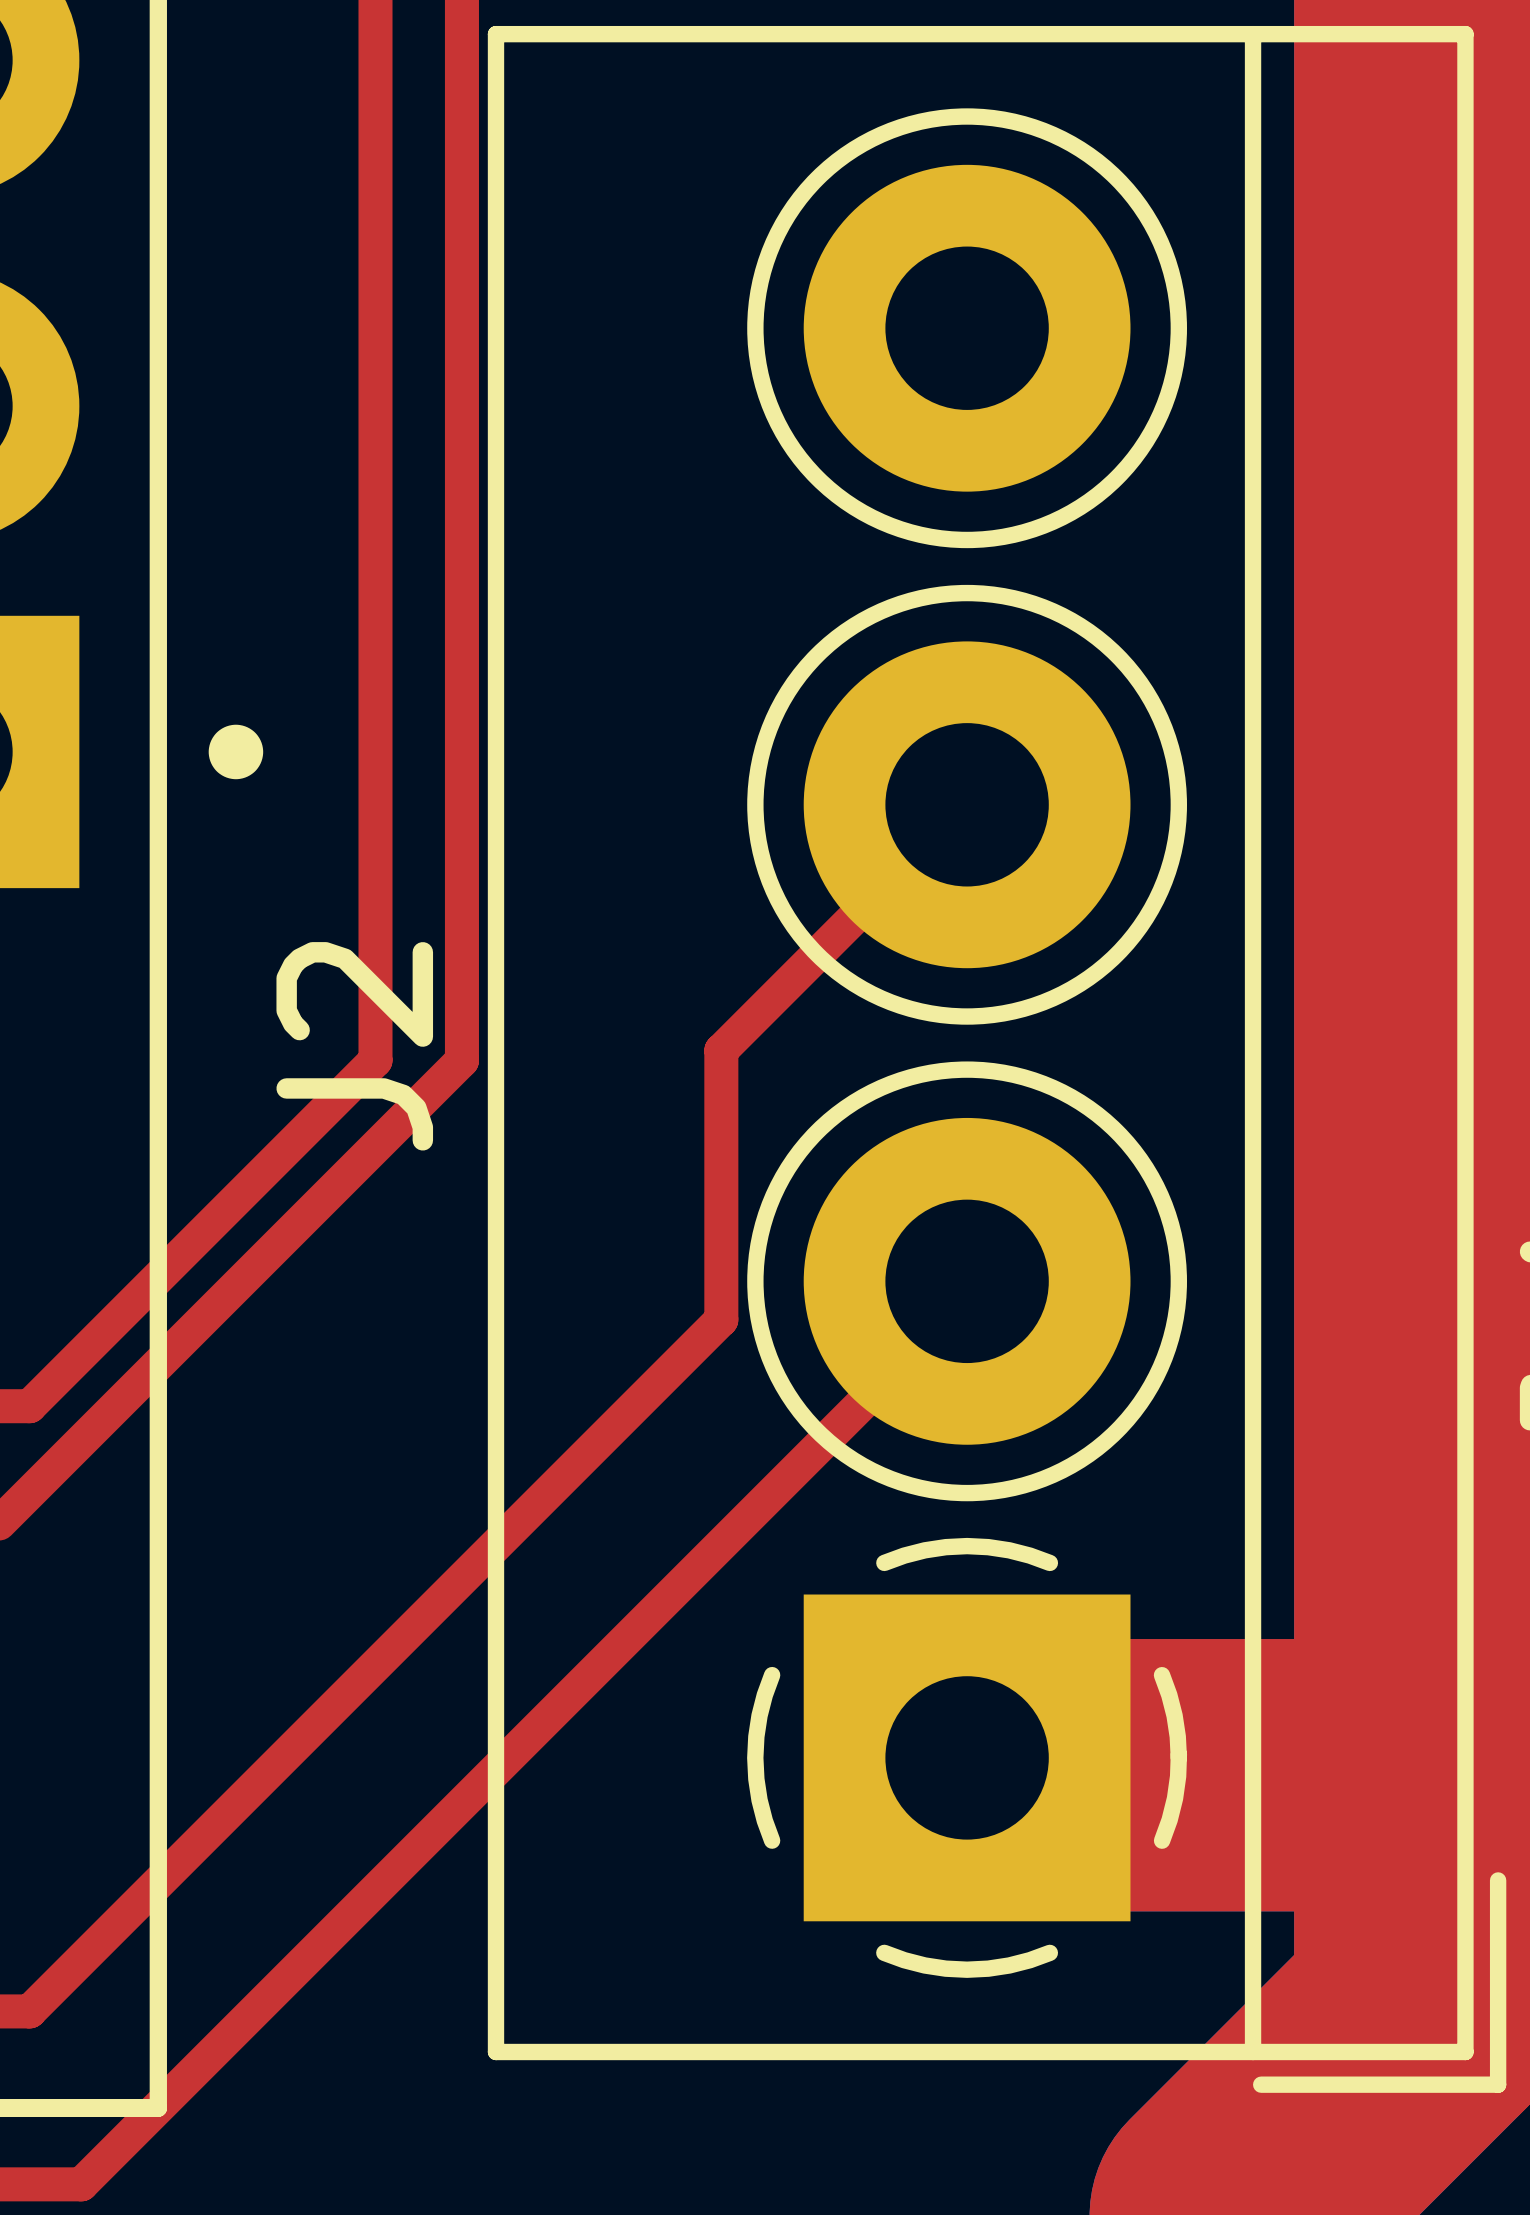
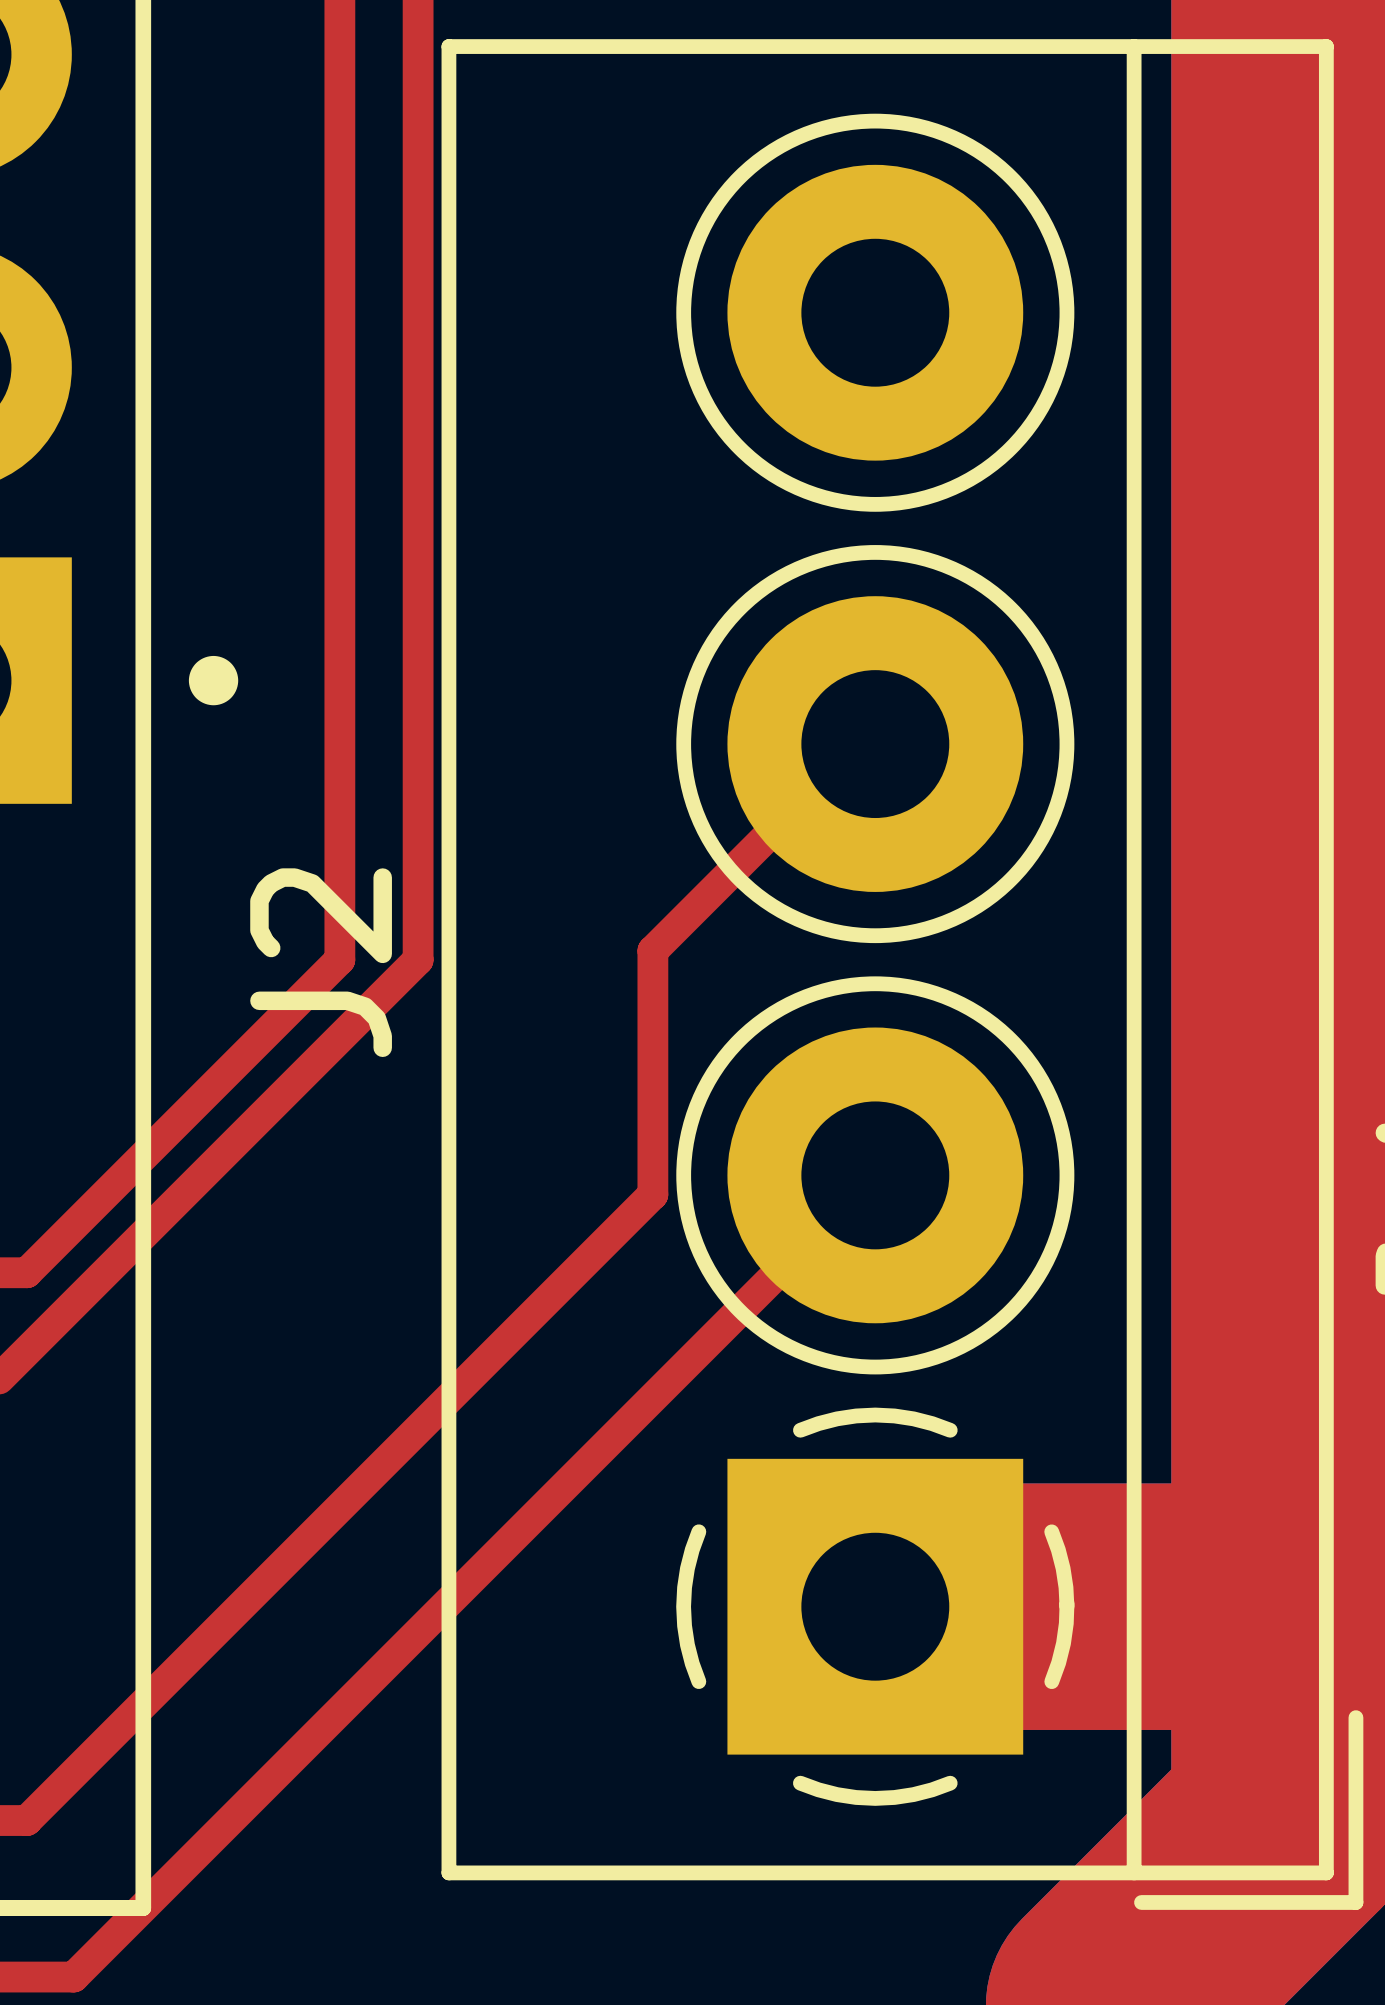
J2 position: (997, 1059) -> (902, 974)

